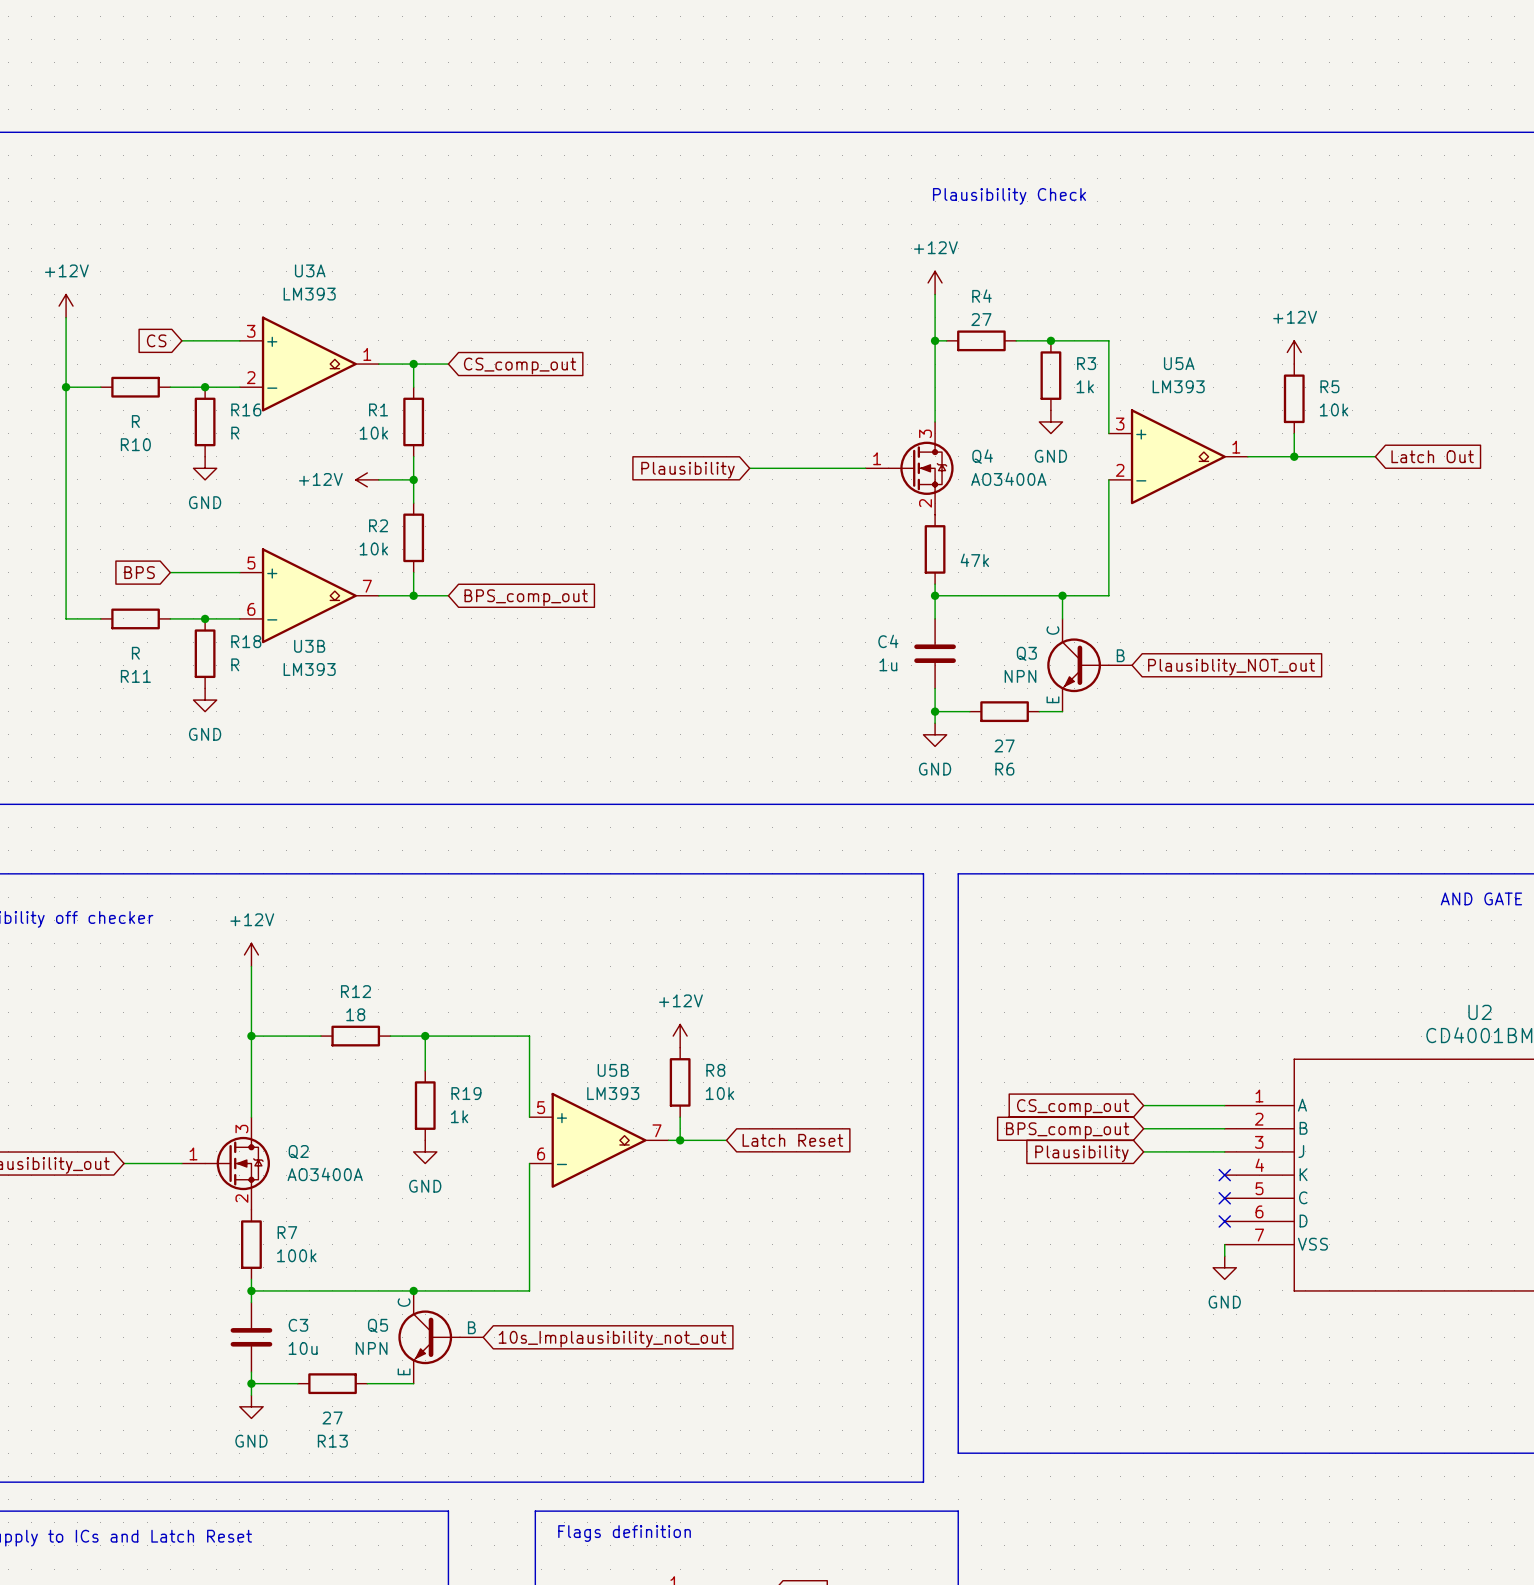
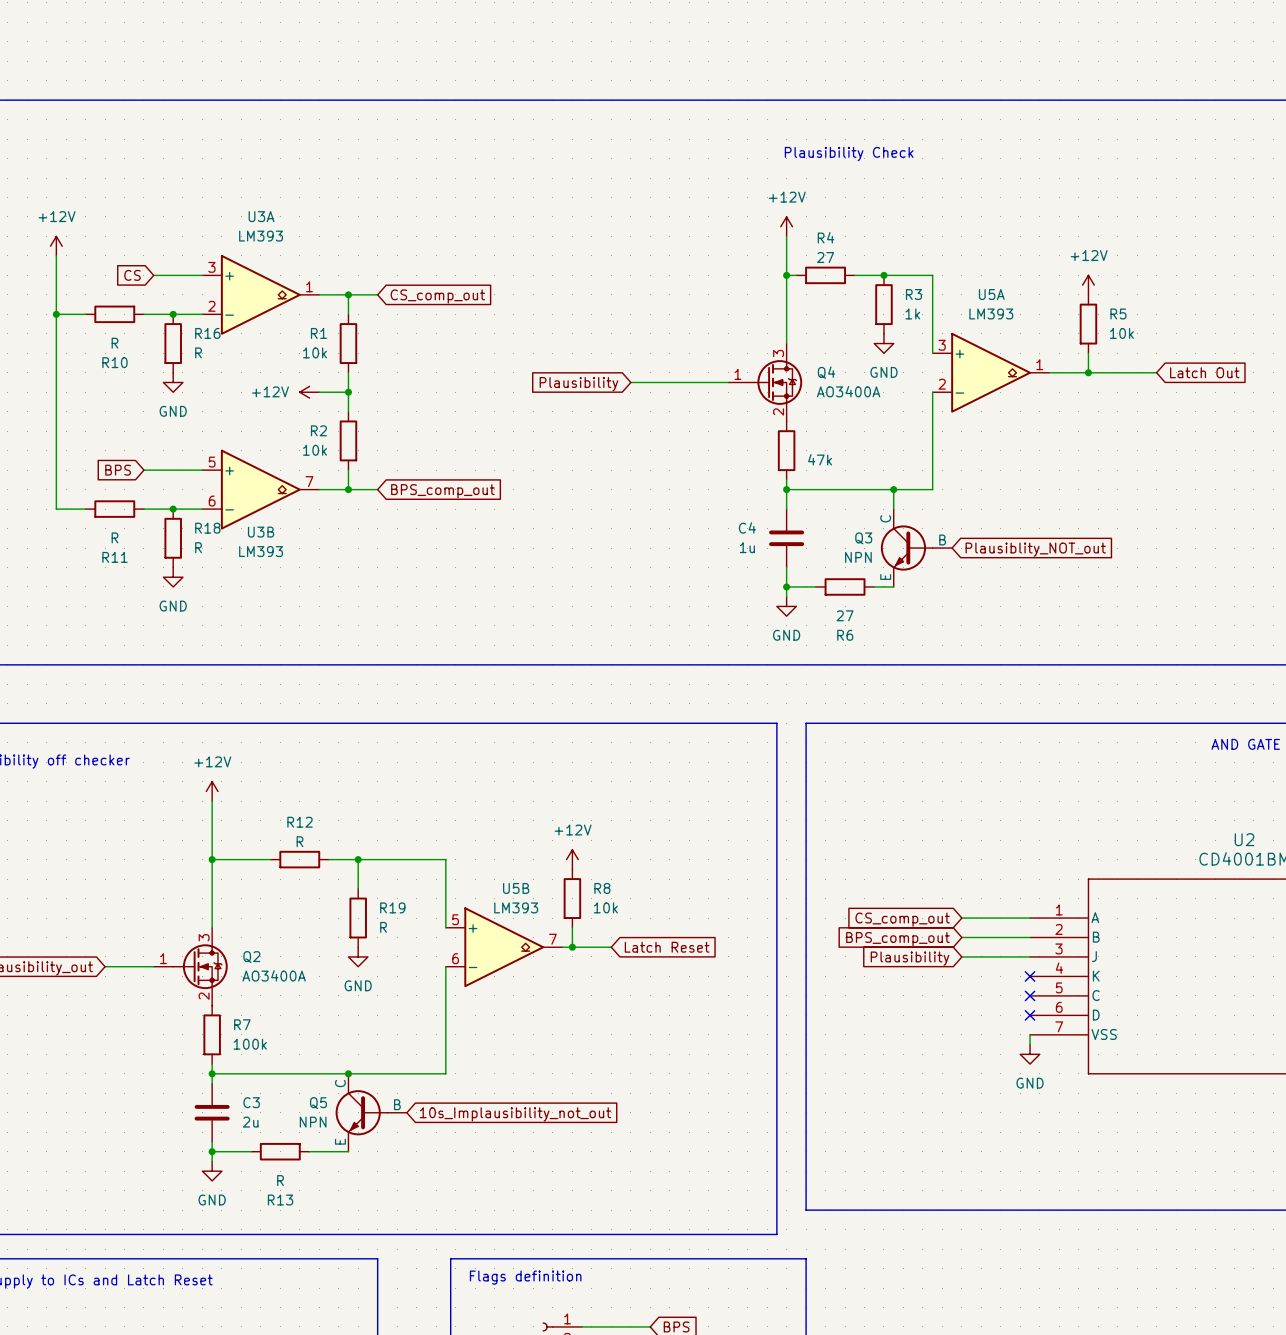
R12 value: 18 (355, 1014) -> R (300, 841)
R19 value: 1k (459, 1116) -> R (383, 927)
C3 value: 10u (303, 1348) -> 2u (250, 1122)
R13 value: 27 (332, 1417) -> R (280, 1180)

